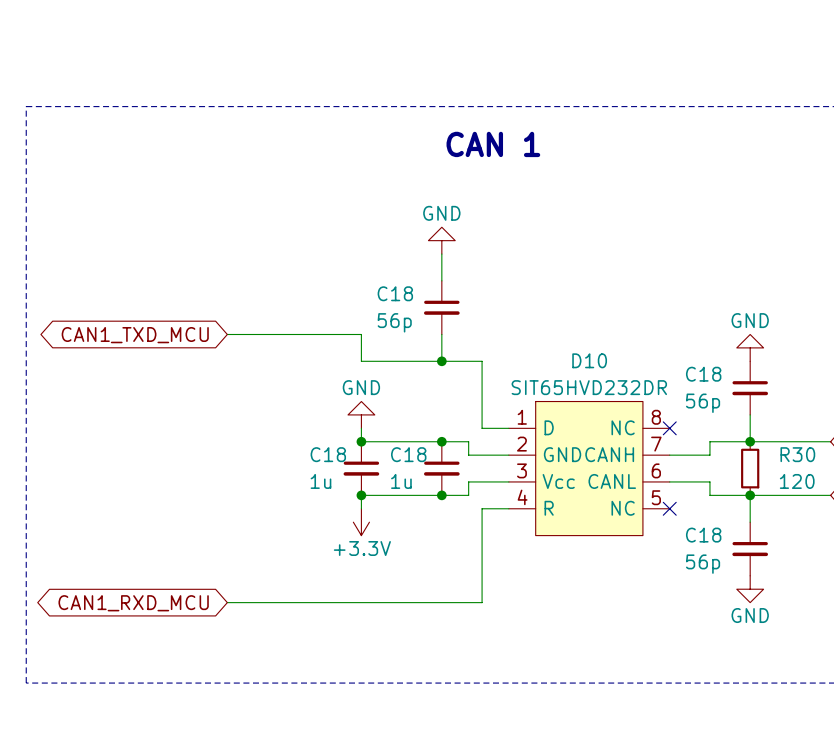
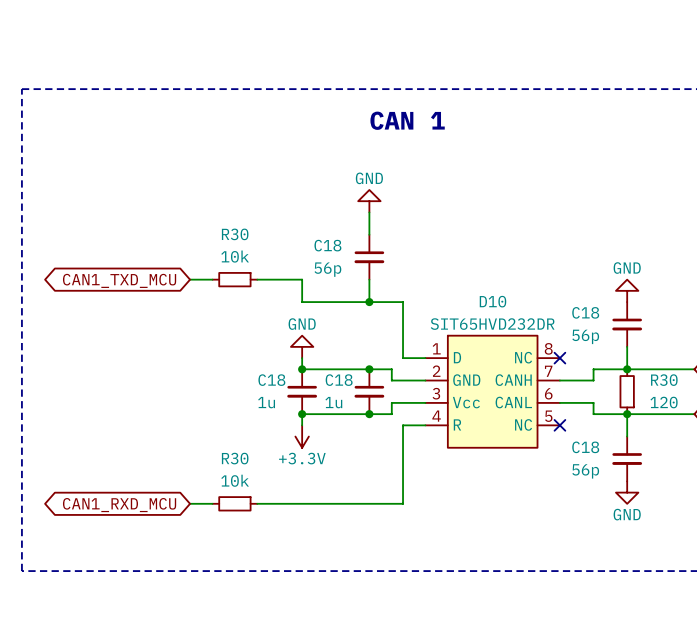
wire: (254, 334) (307, 334) -> none
R30: none -> 10k (234, 279)
wire: (254, 602) (307, 602) -> none
R30: none -> 10k (234, 503)

